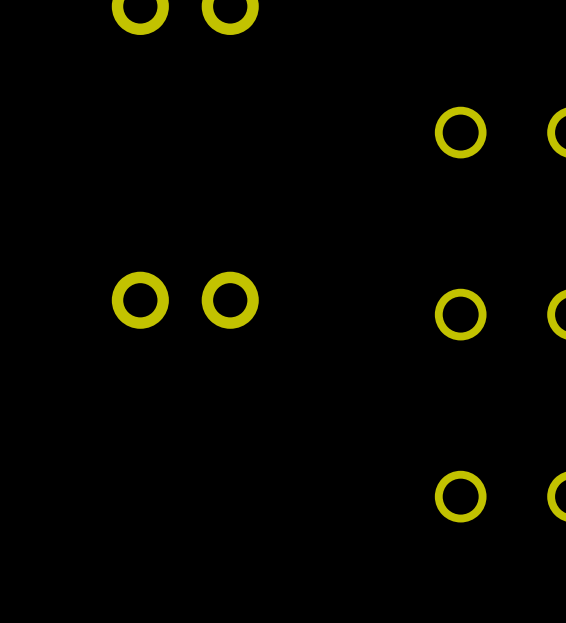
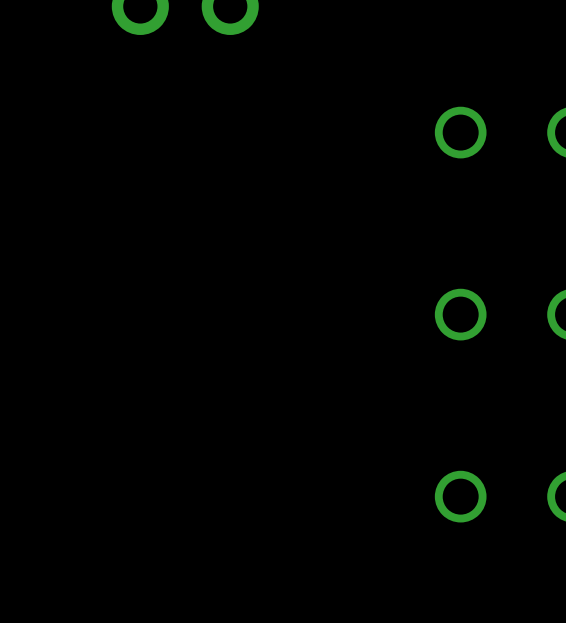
part: (185, 300) -> none

